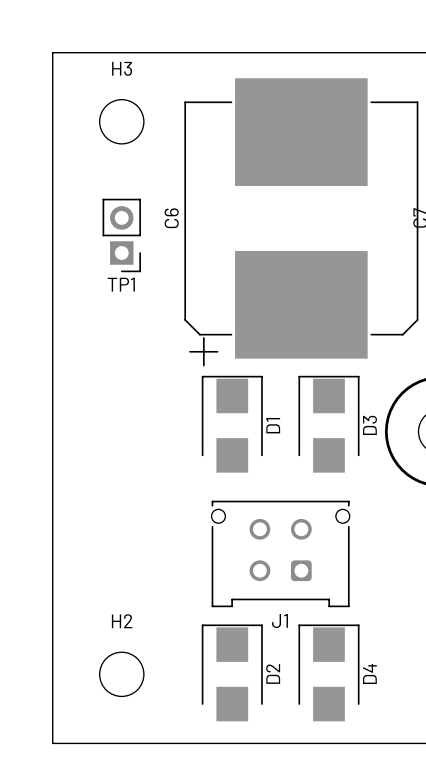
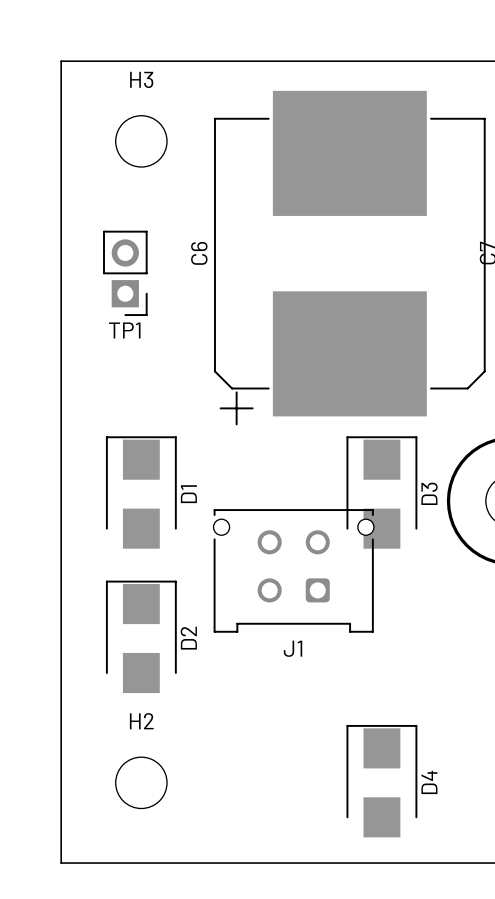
TP1 position: (121, 235) -> (125, 273)
D1 position: (232, 424) -> (141, 492)
J1 position: (280, 553) -> (293, 570)
D2 position: (232, 672) -> (141, 636)

